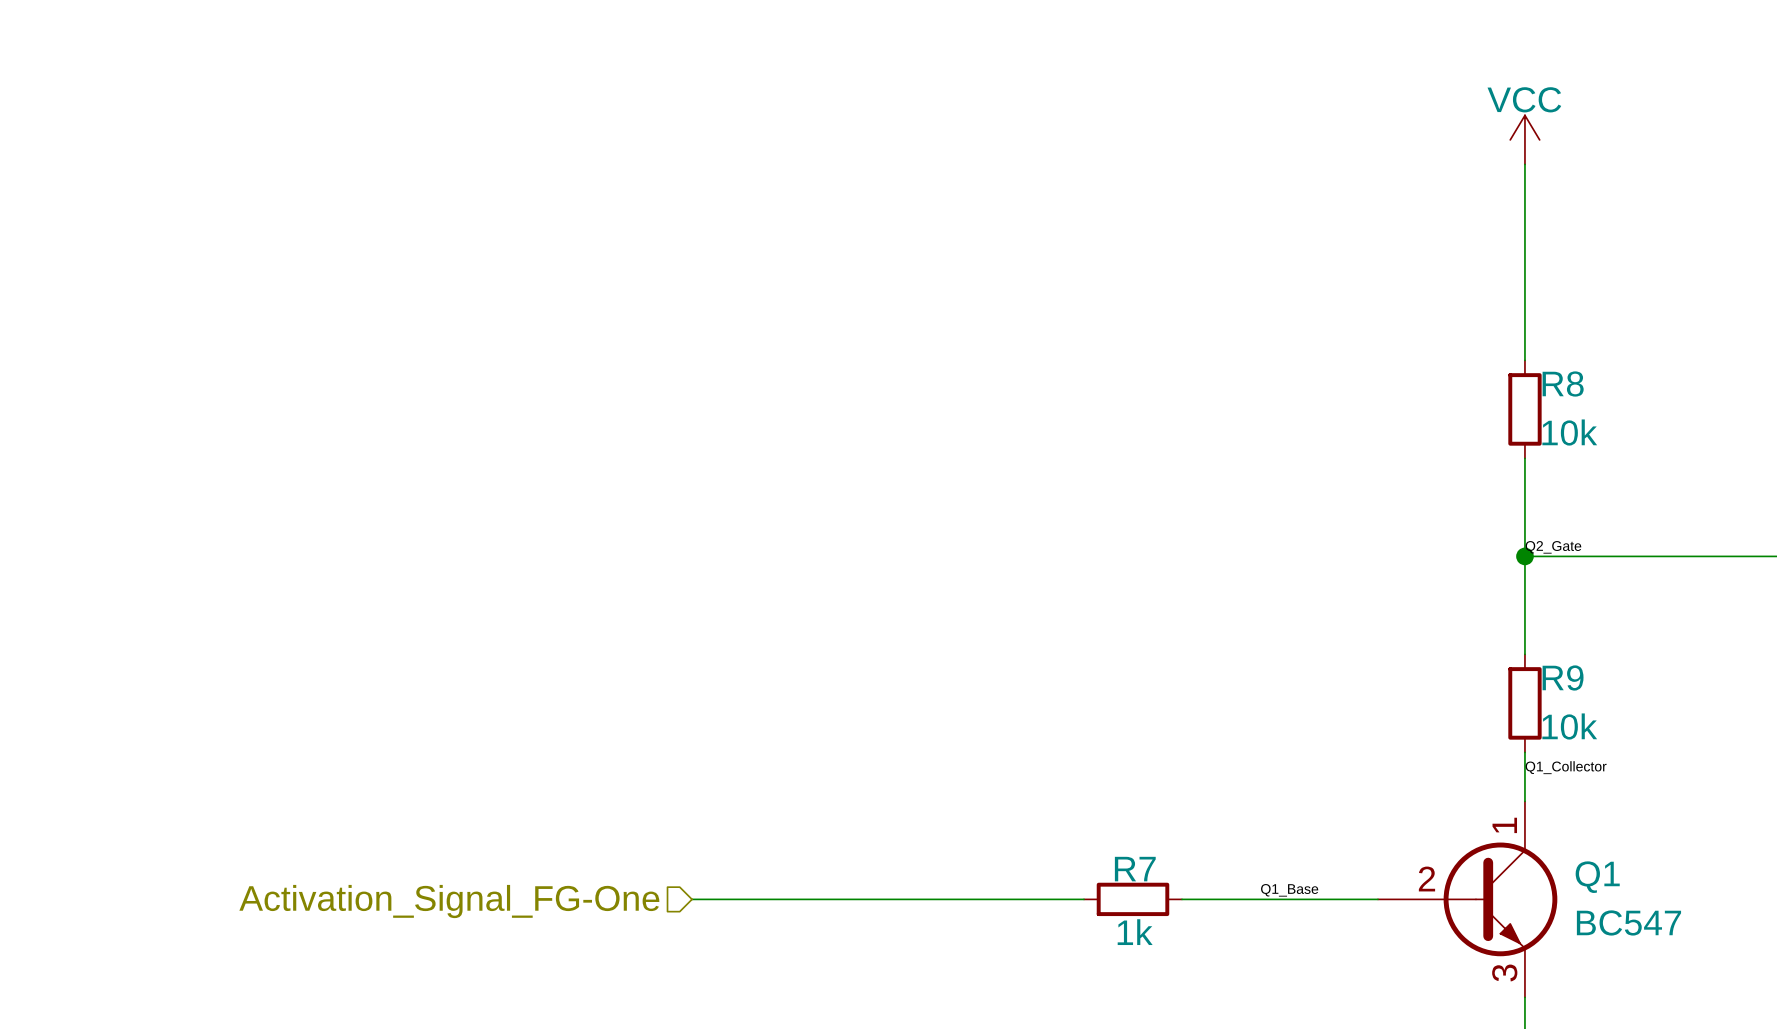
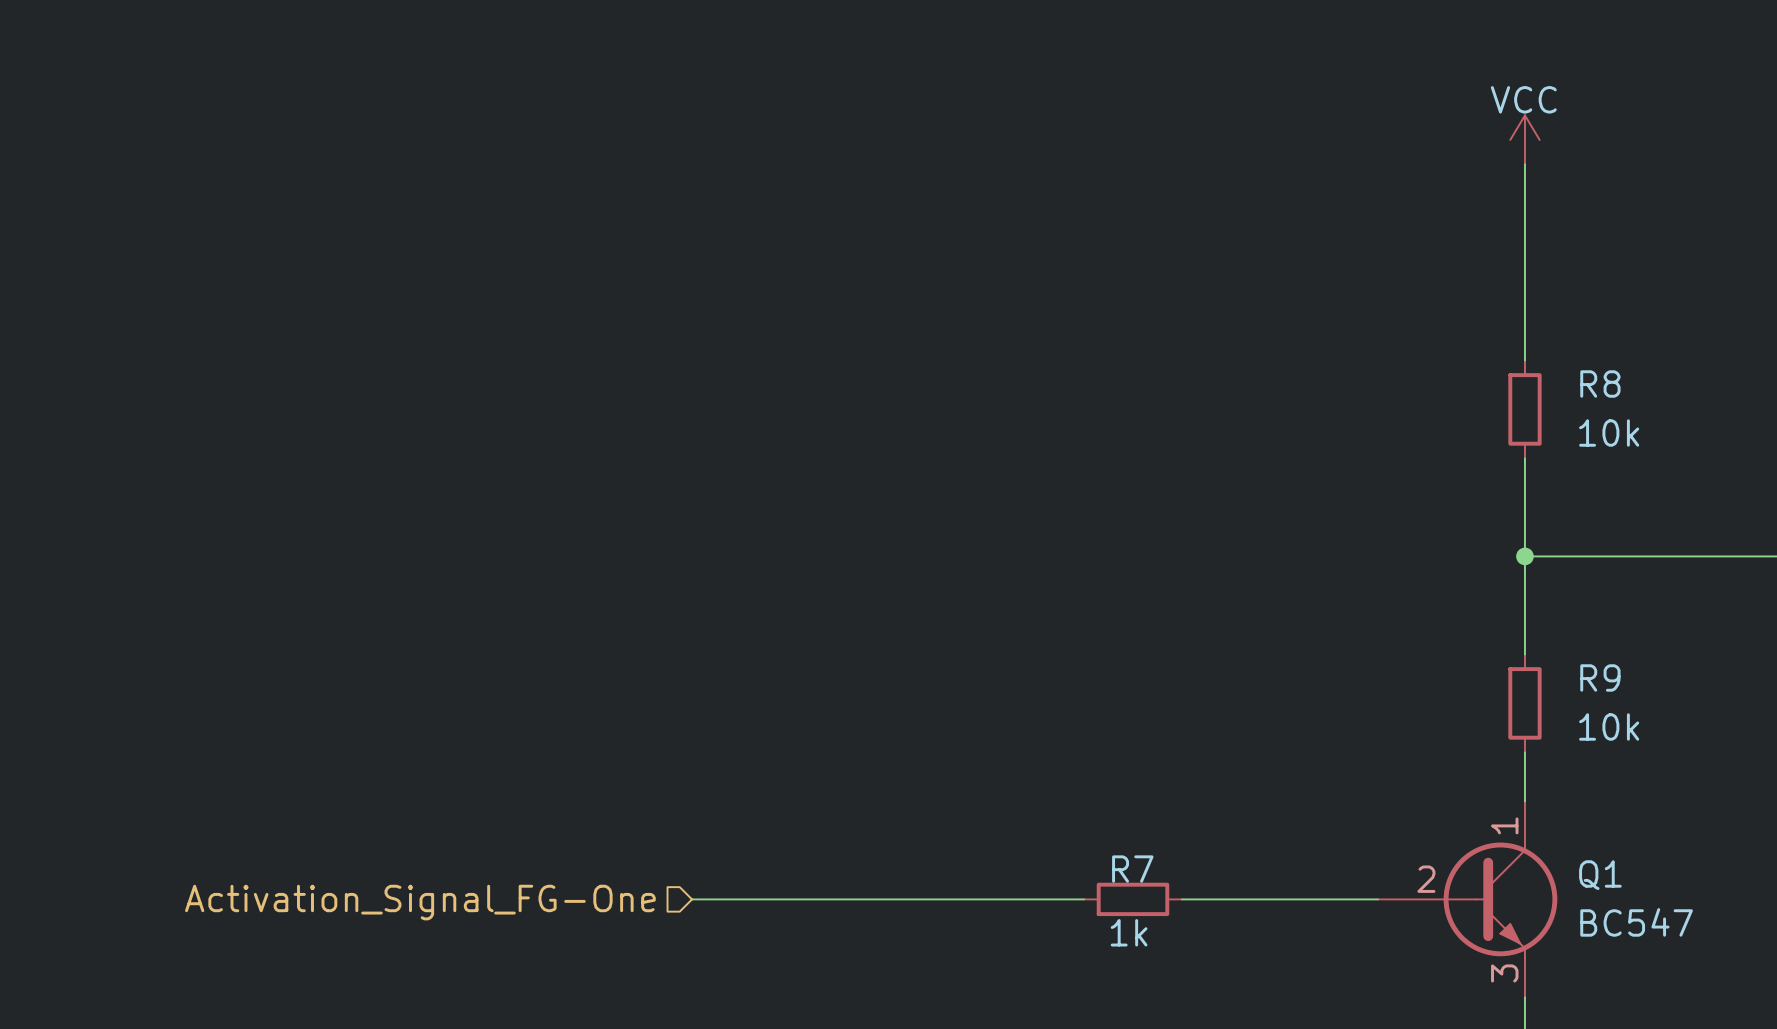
R8 name position: R8 (1563, 384) -> R8 (1600, 384)
R8 value position: 10k (1569, 432) -> 10k (1609, 433)
label: Q2_Gate (1553, 547) -> none
R9 name position: R9 (1563, 677) -> R9 (1600, 677)
R9 value position: 10k (1569, 726) -> 10k (1609, 726)
label: Q1_Collector (1566, 767) -> none
label: Q1_Base (1289, 890) -> none

